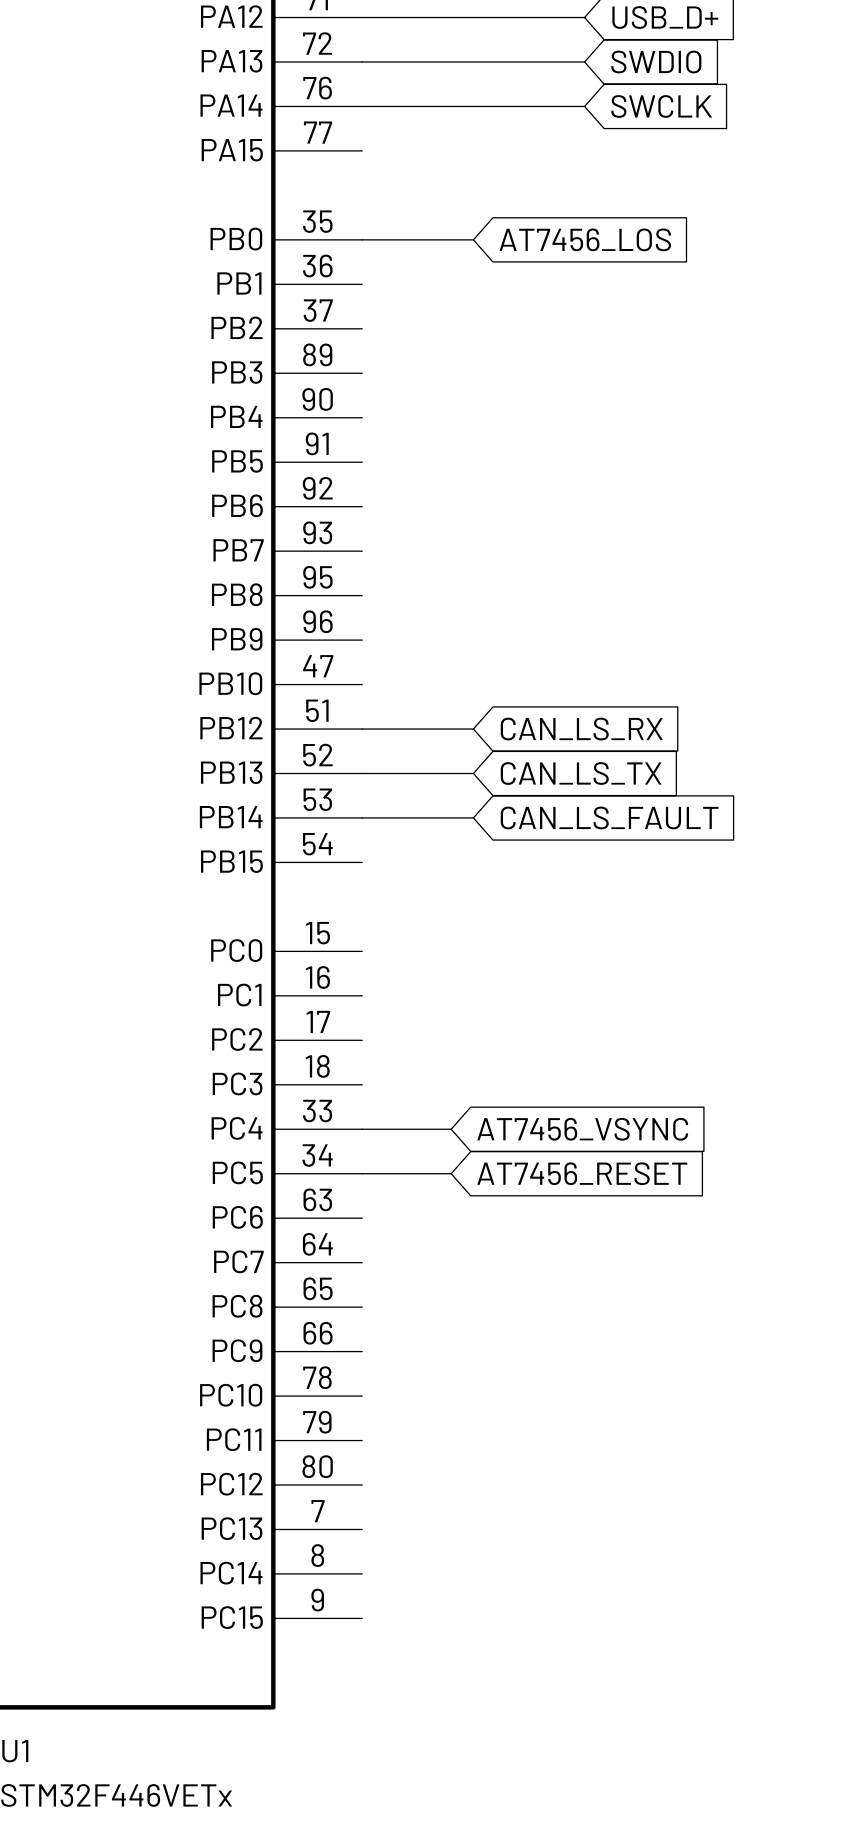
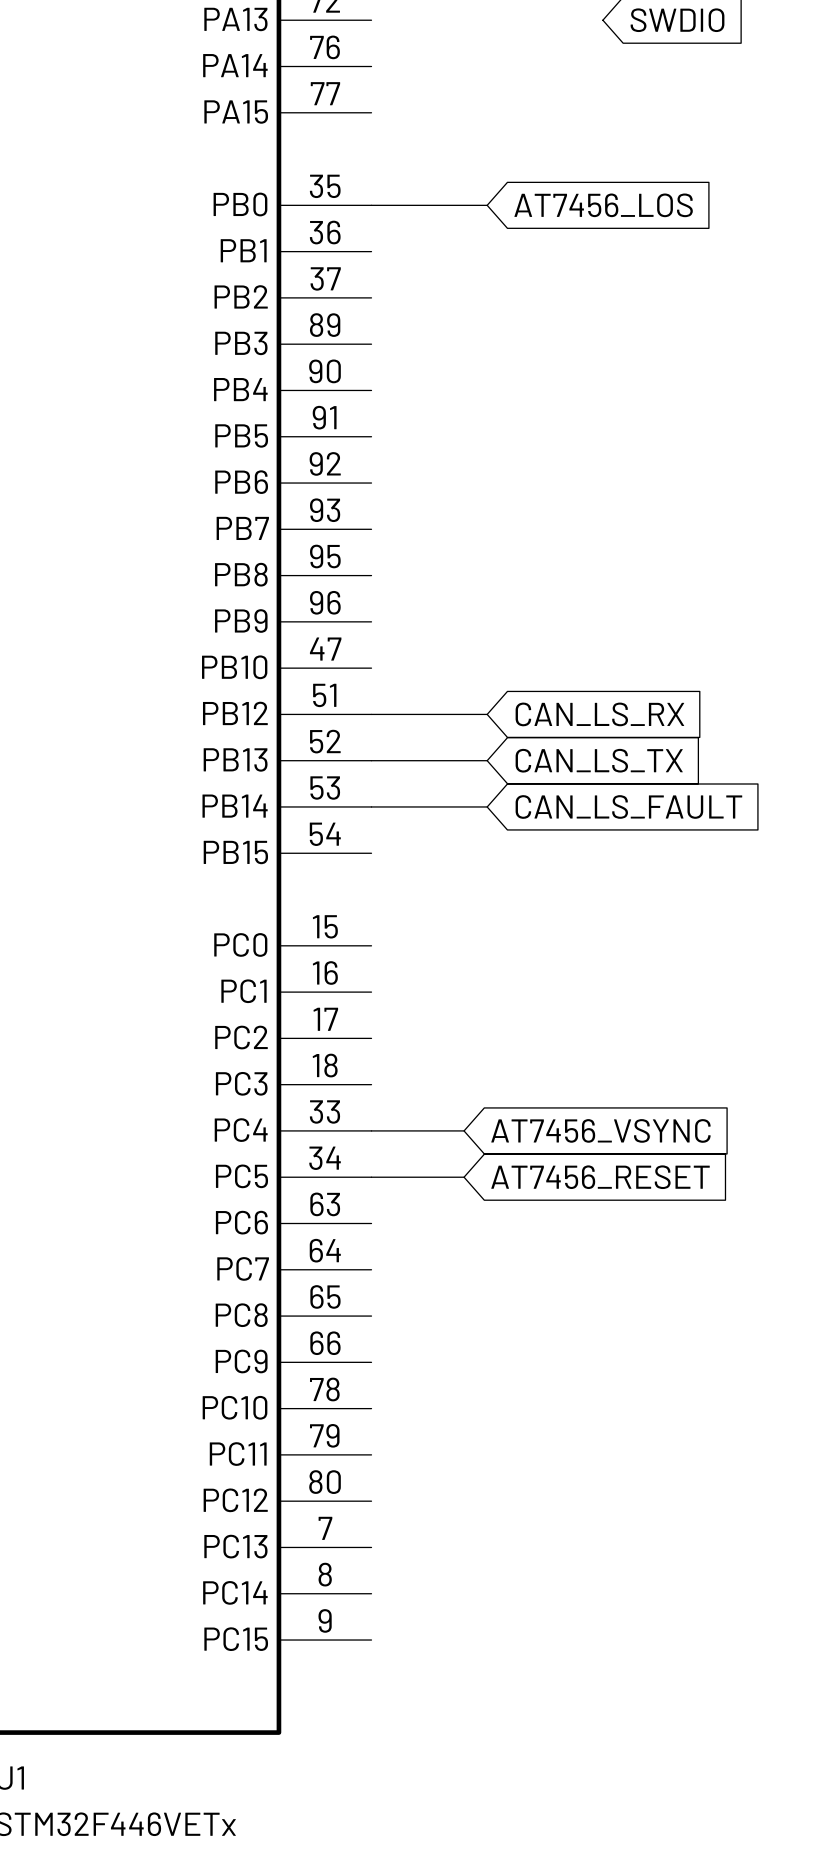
wire: (362, 61) (584, 61) -> none
wire: (362, 106) (584, 106) -> none
global label: SWCLK (661, 106) -> none

